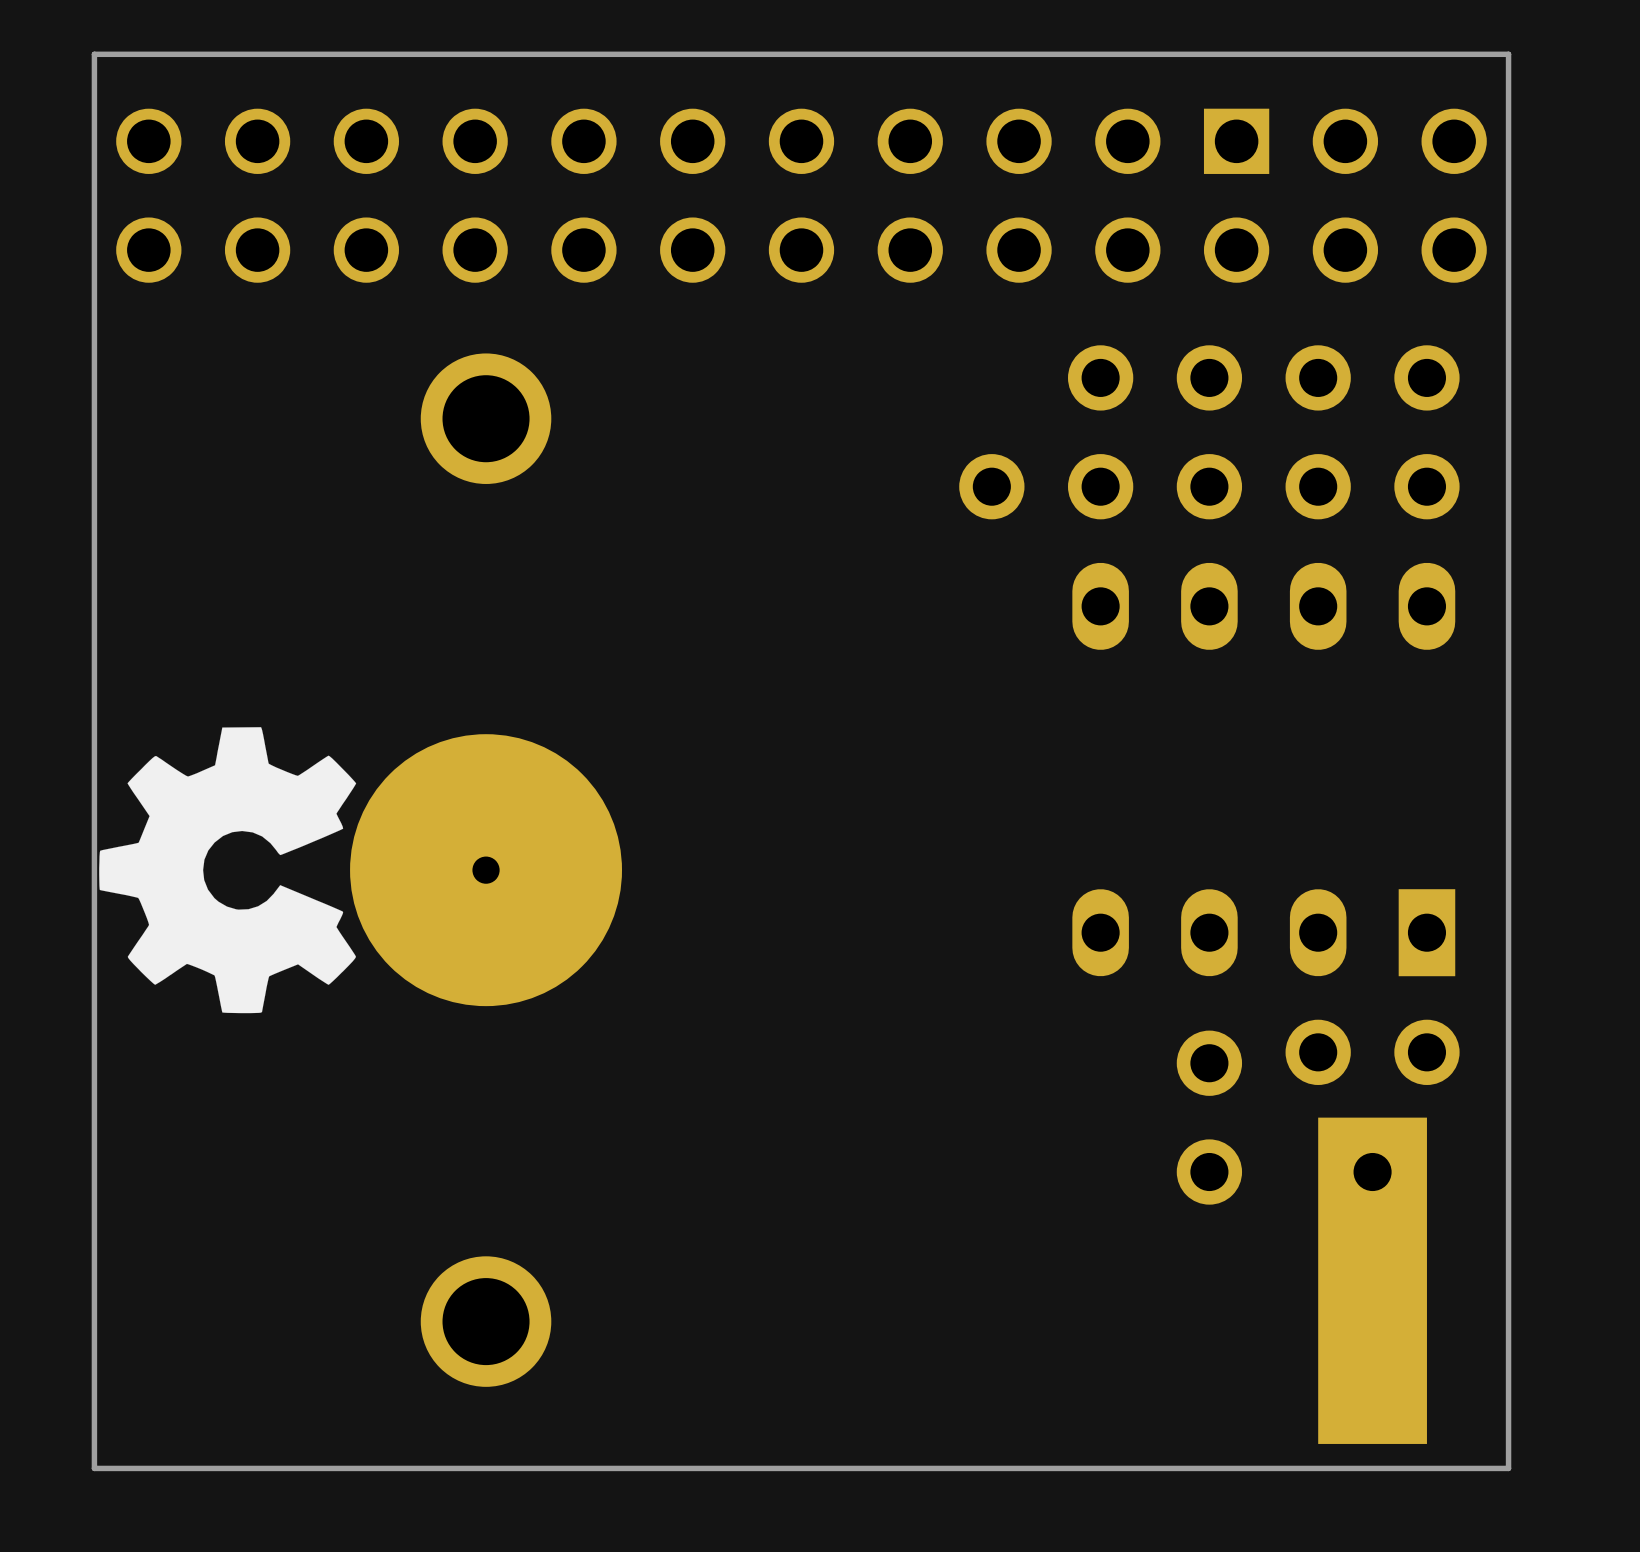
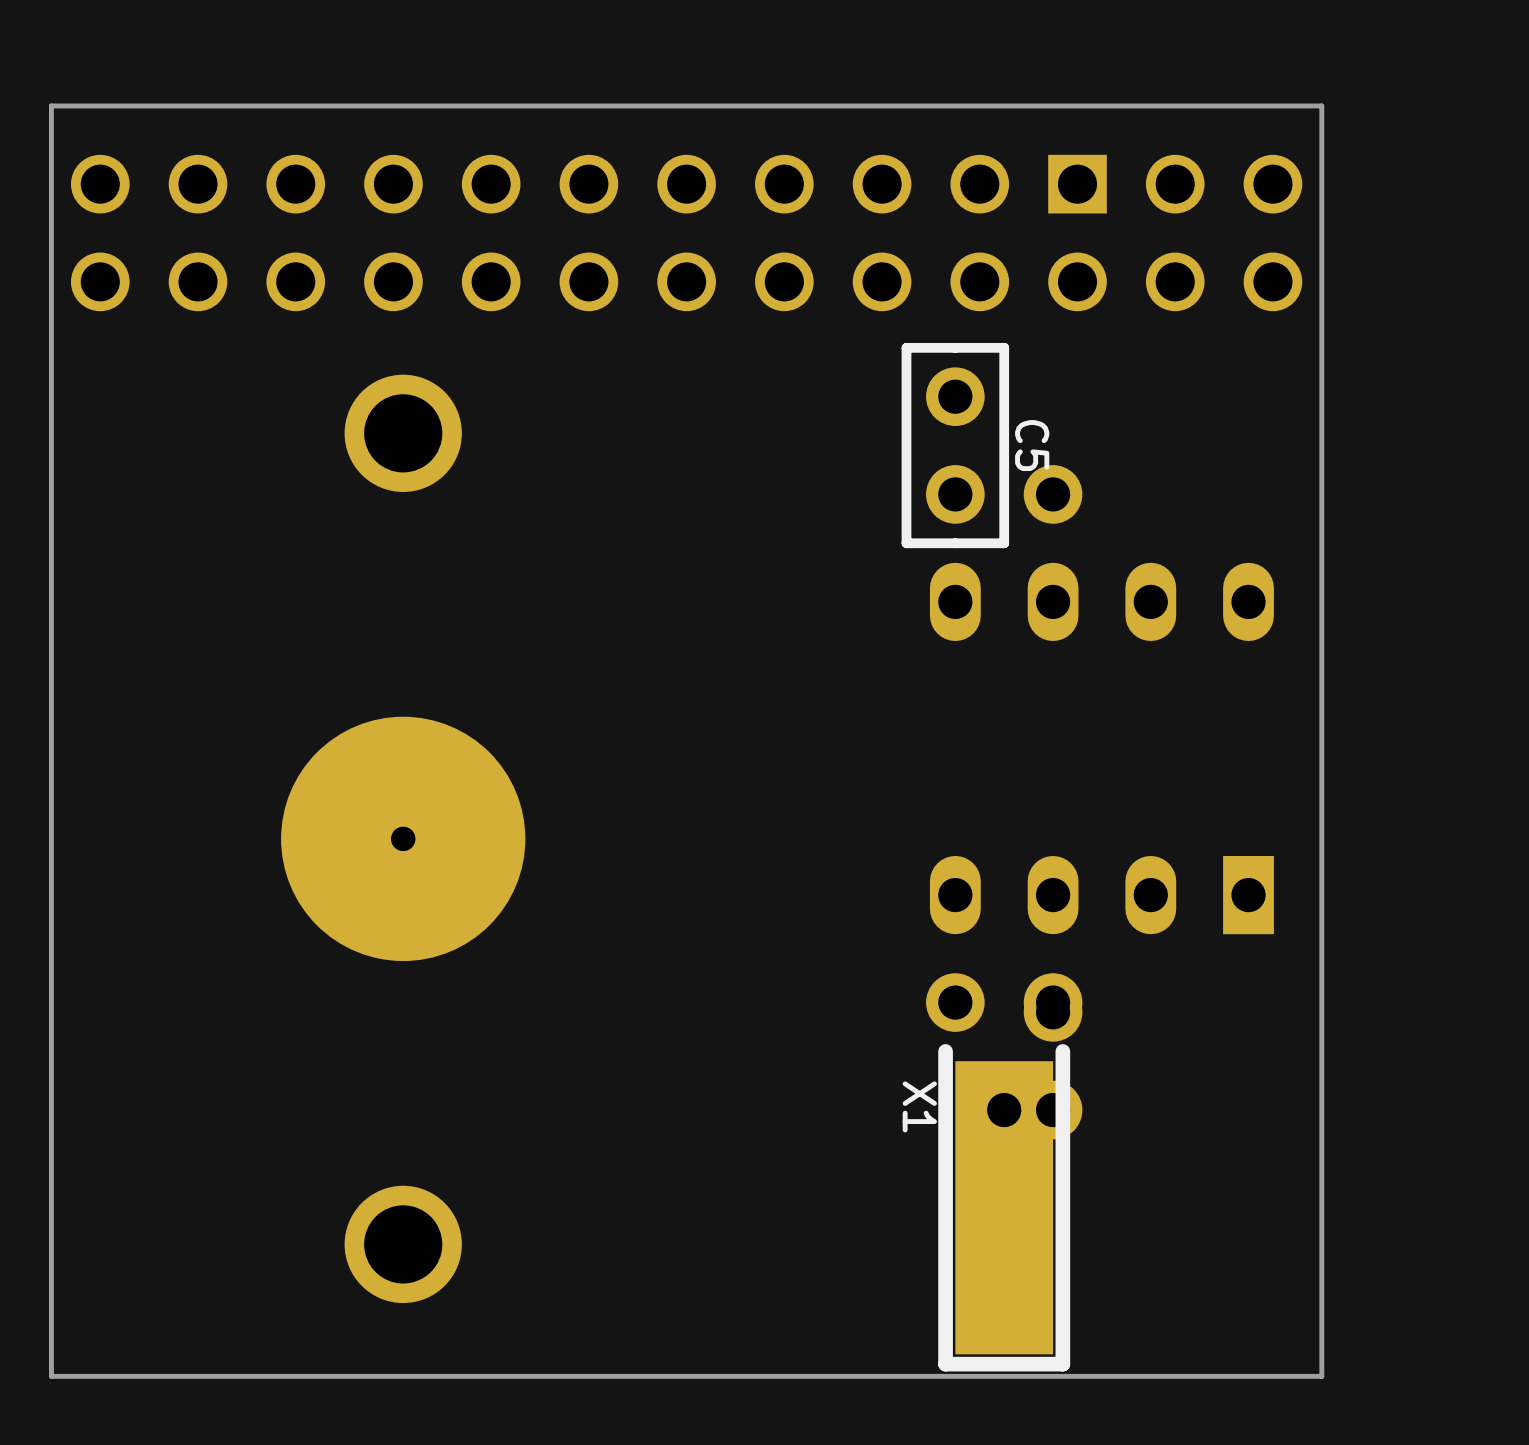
part: (1209, 432) -> none
part: (1318, 432) -> none
C5 side: top (1426, 432) -> bottom (955, 445)
part position: (991, 486) -> (1053, 494)
drawing: [99, 727, 357, 1014] -> none
X1 side: top (1372, 1231) -> bottom (1004, 1172)

